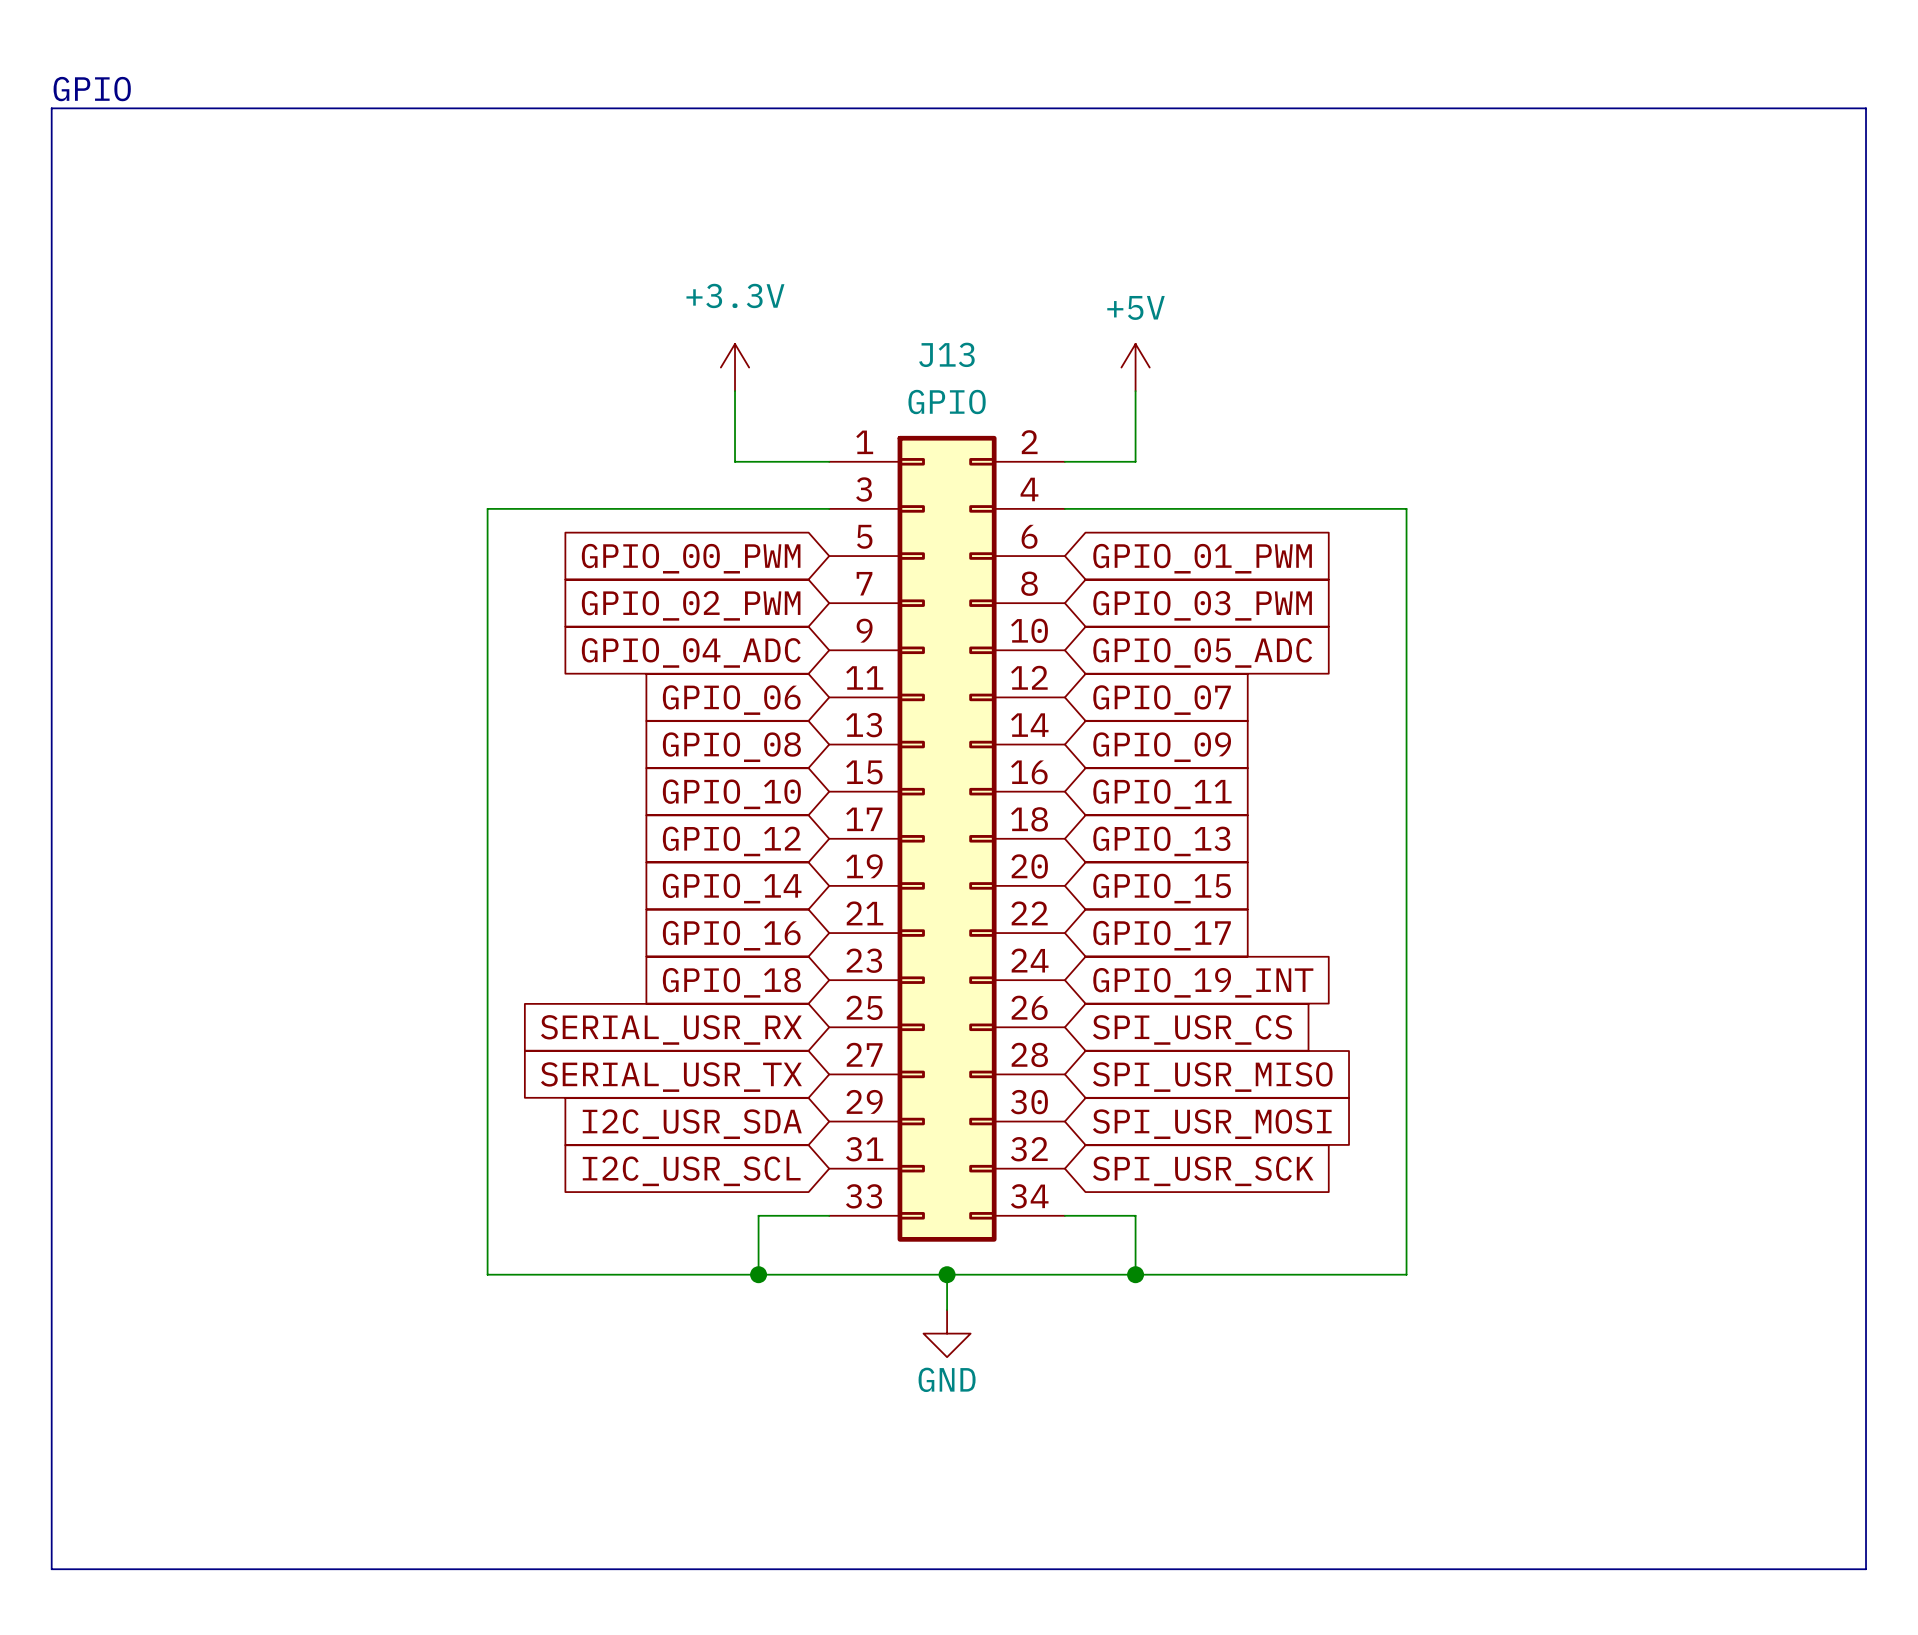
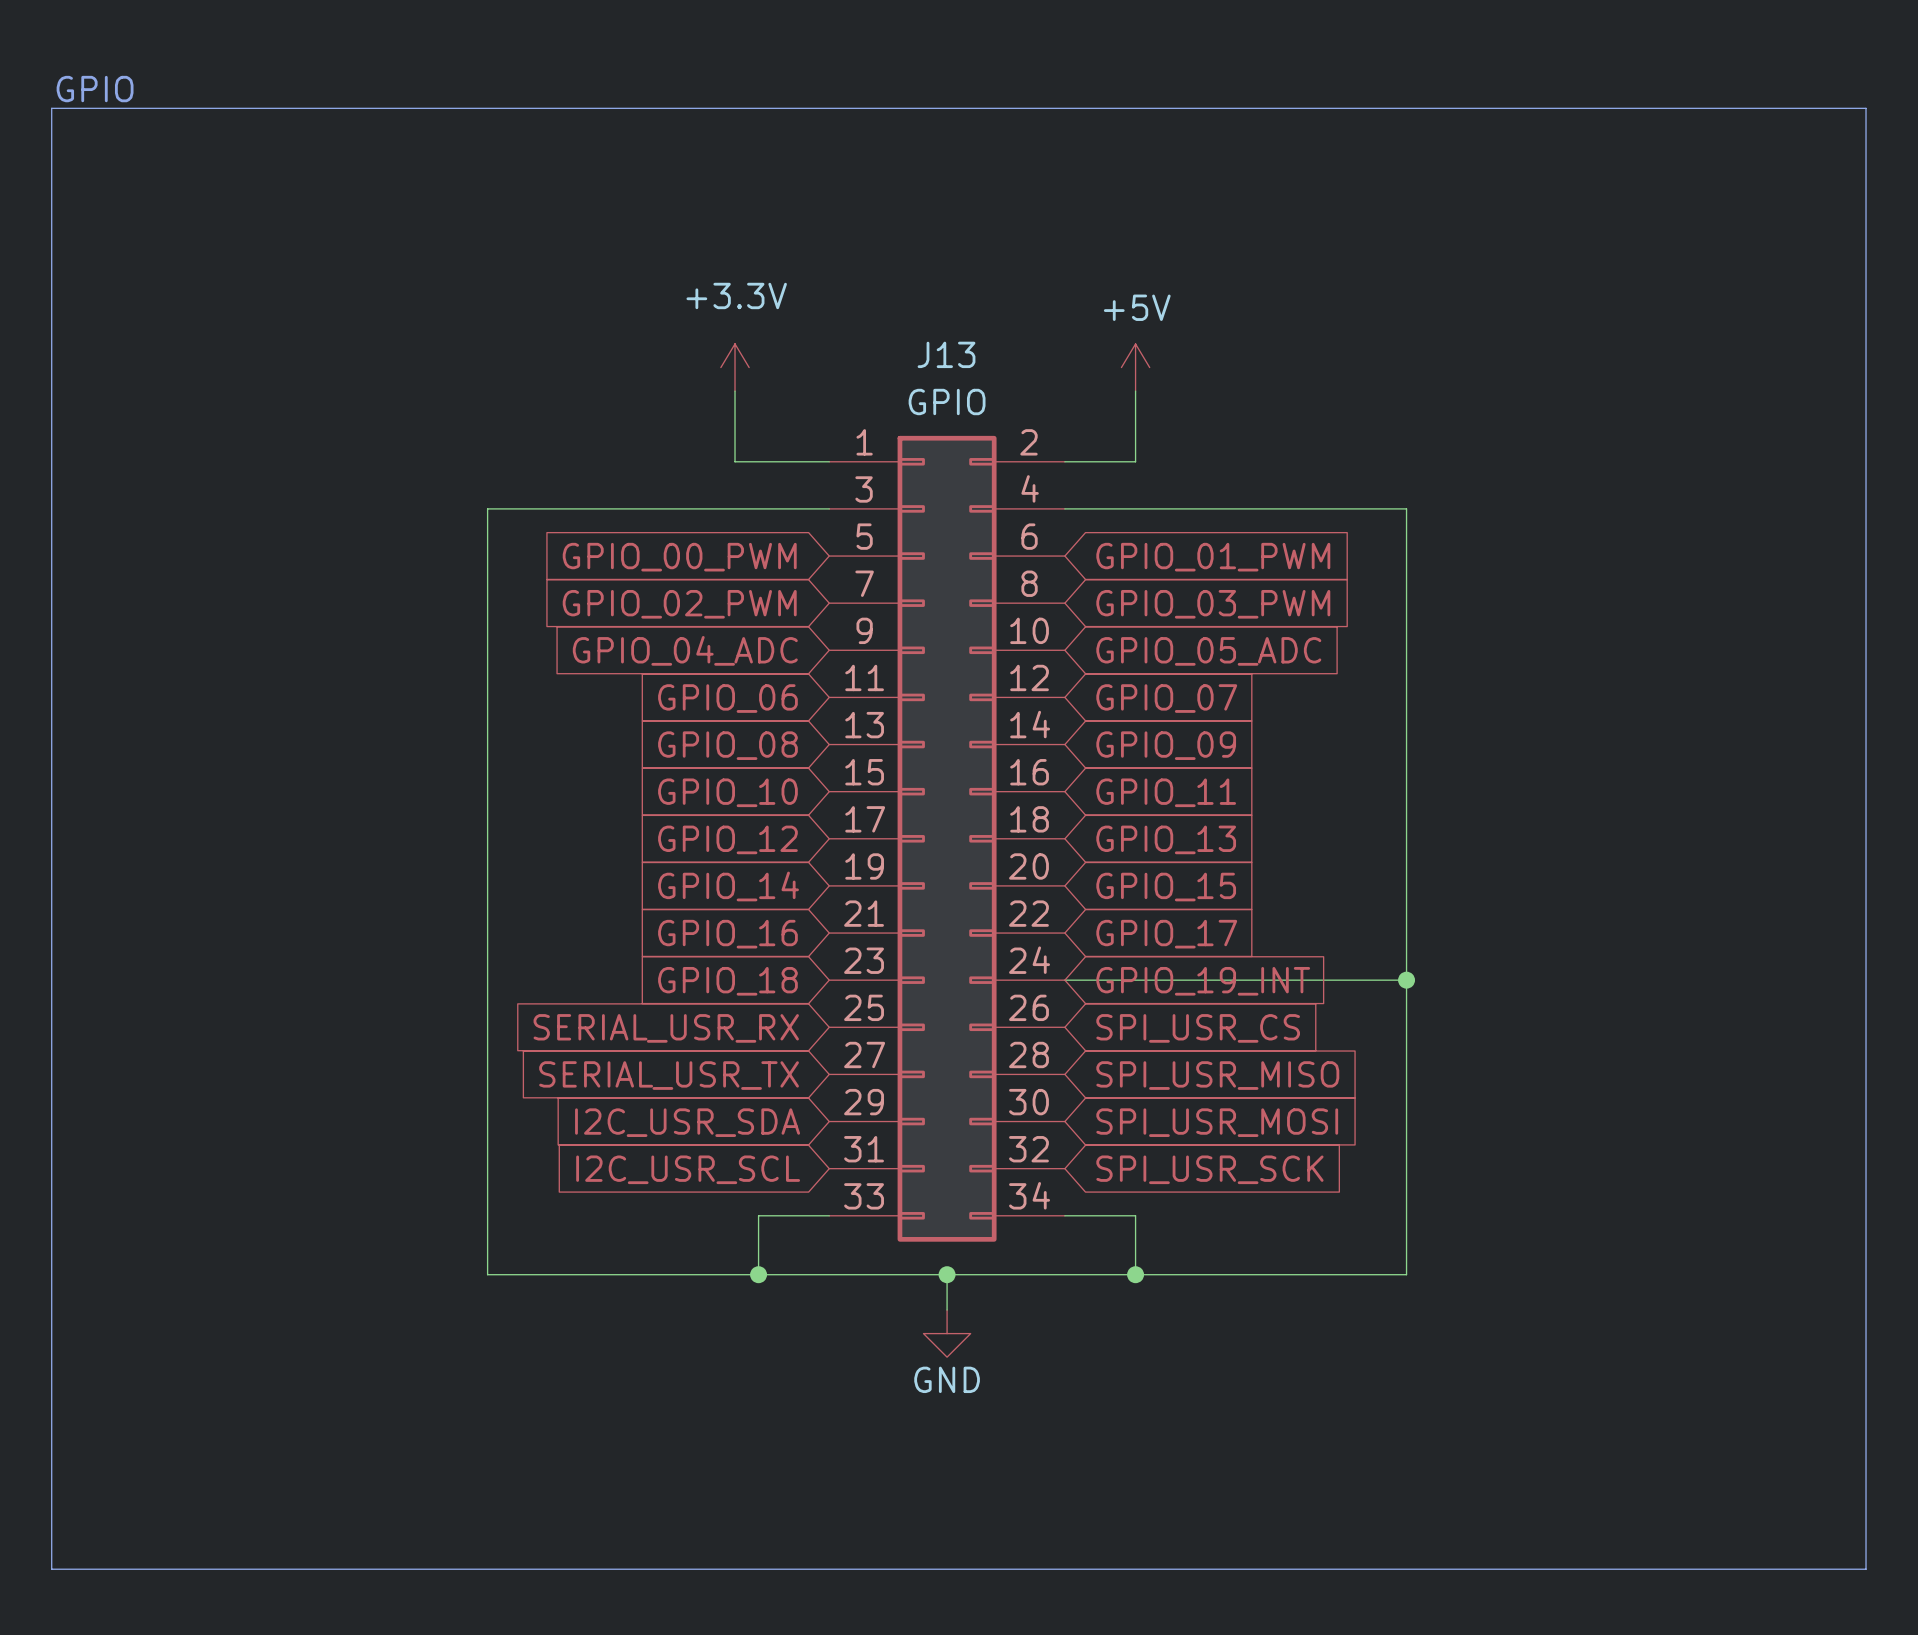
wire: none -> (1064, 980) (1406, 980)
junction: none -> (1406, 980)

